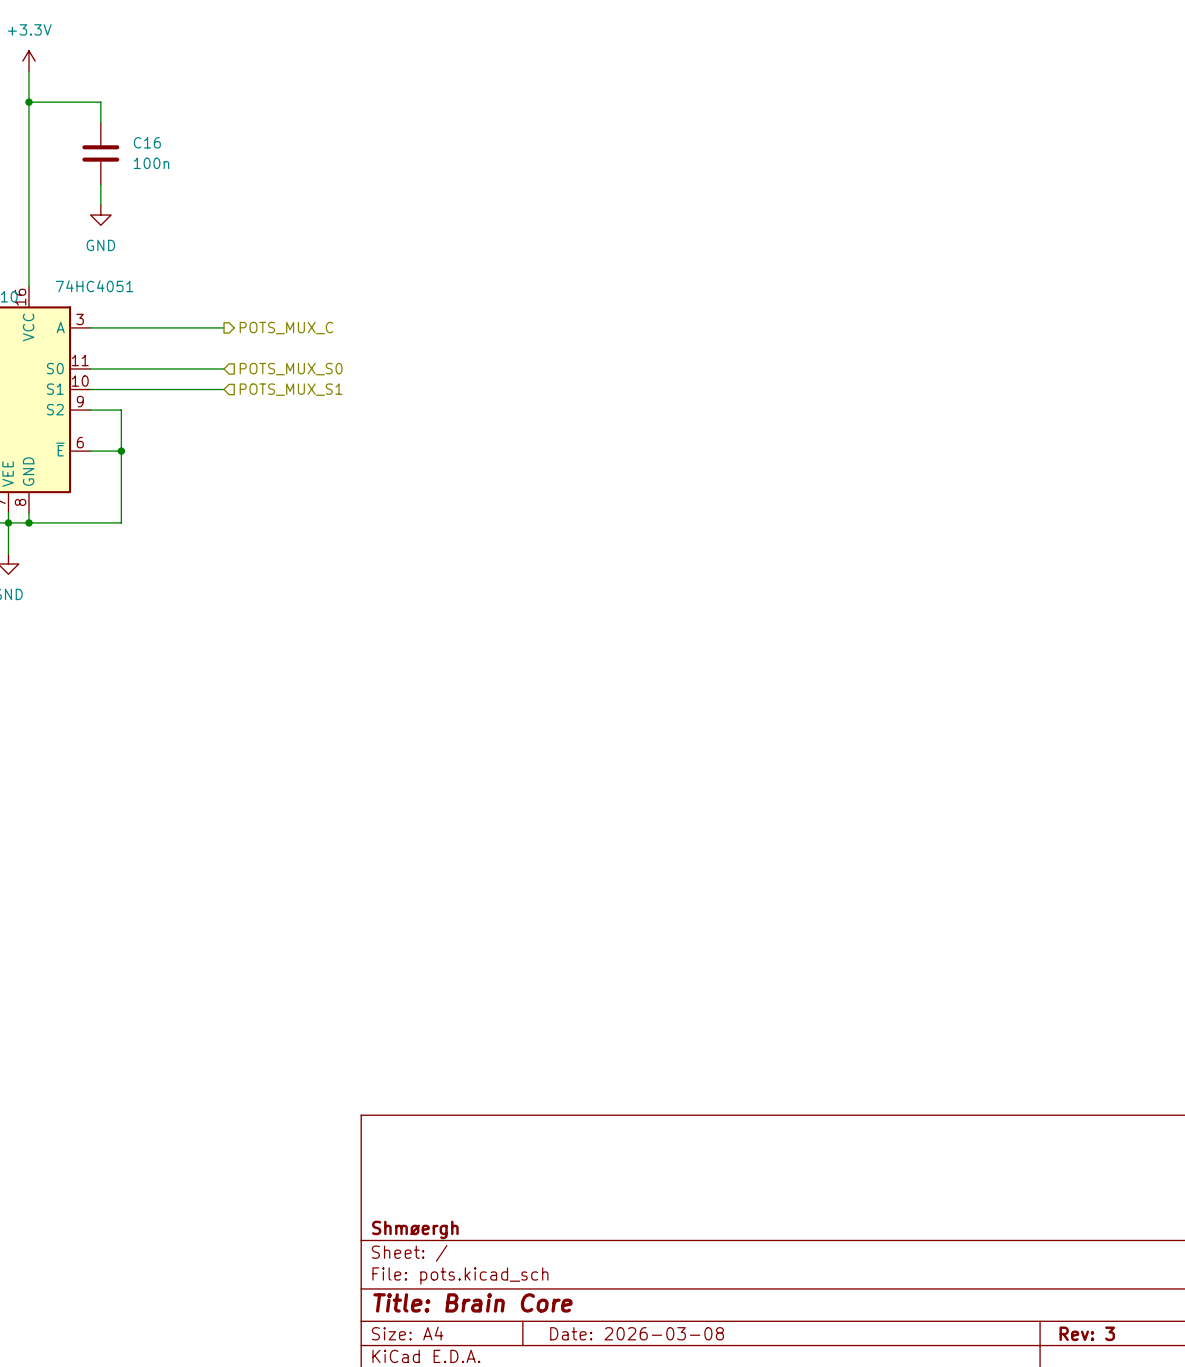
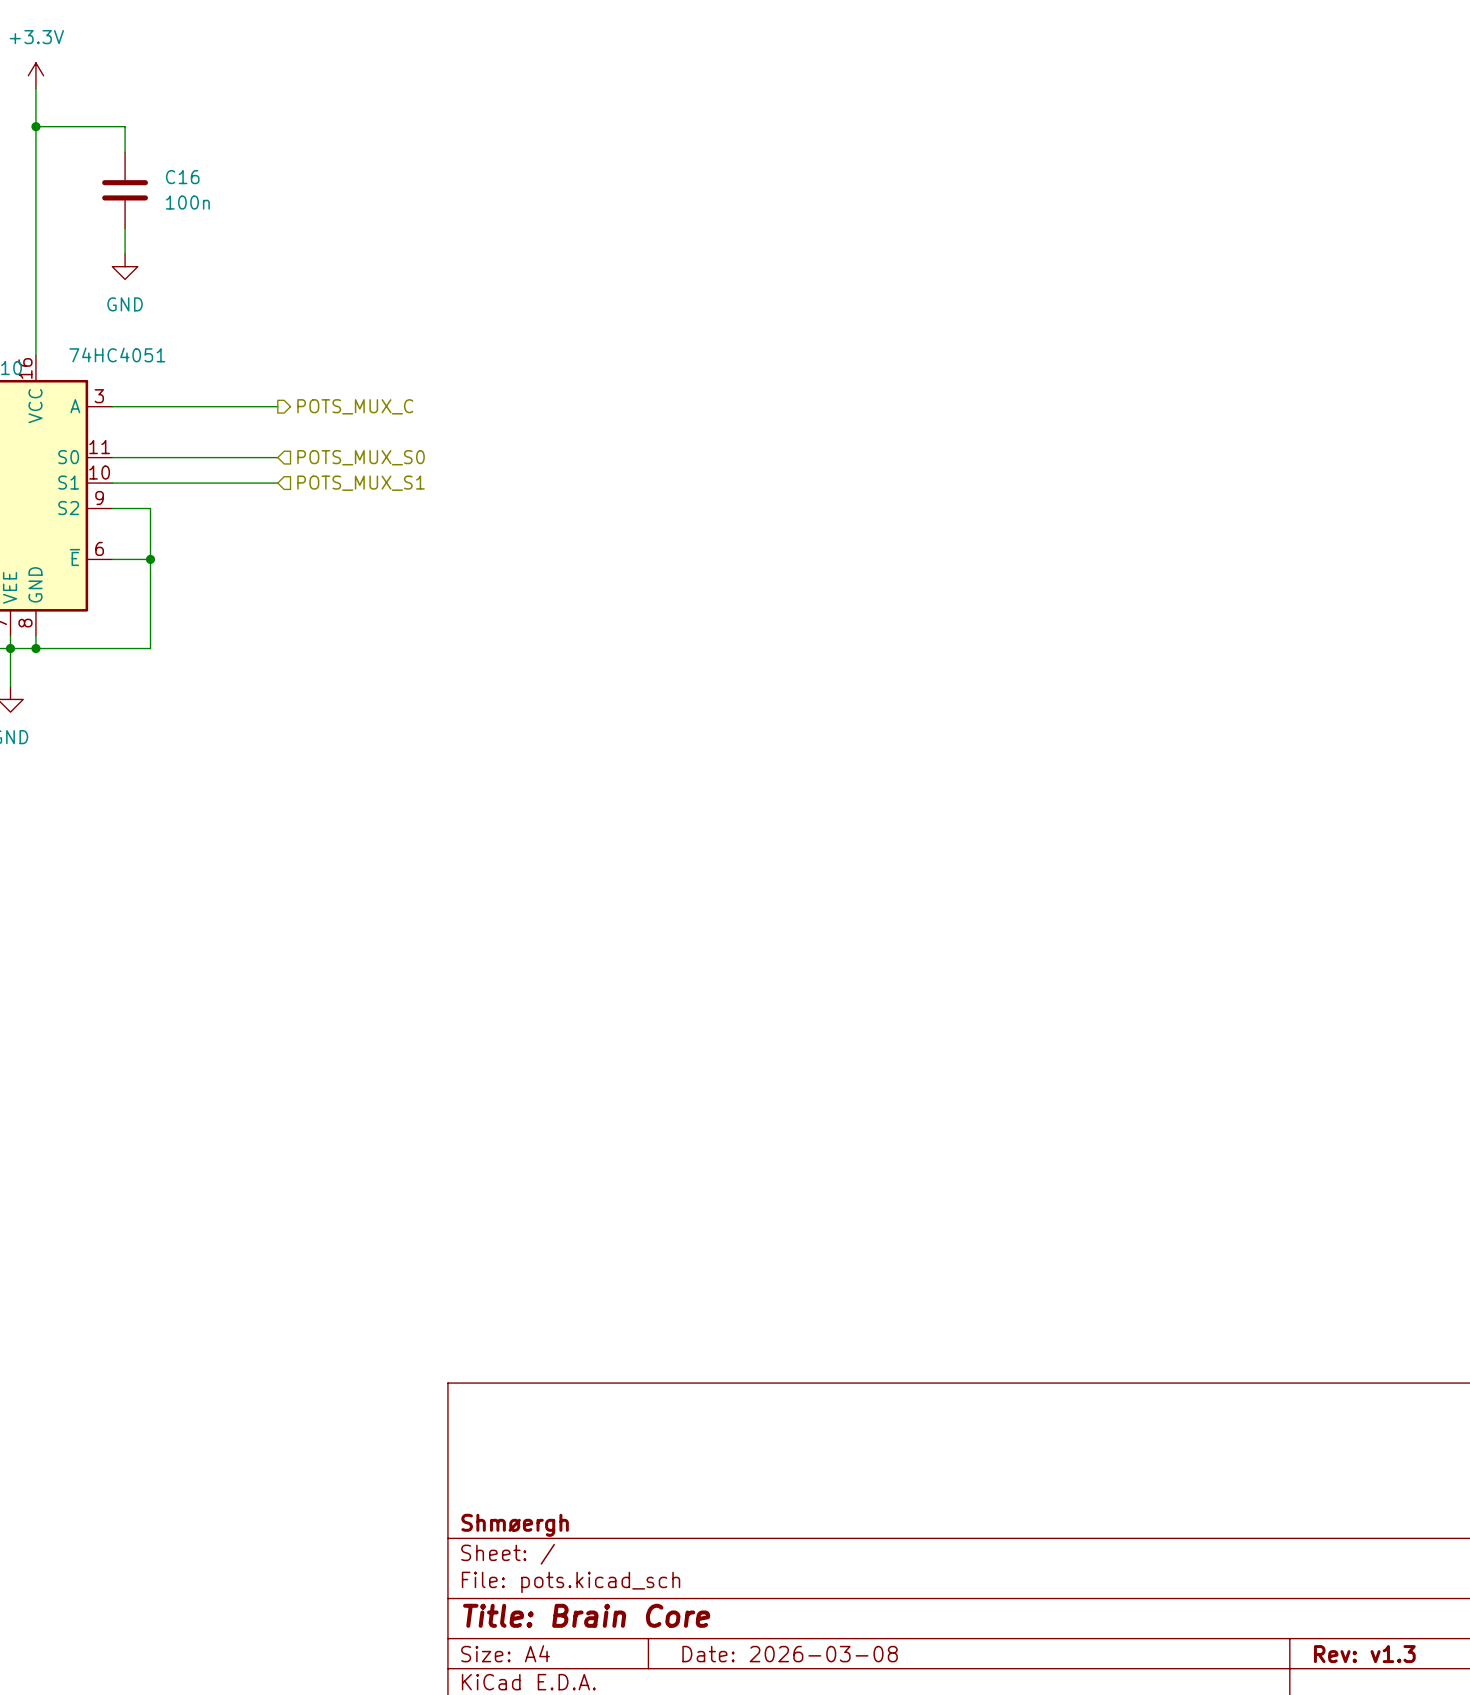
title block: Rev: 3 (1087, 1333) -> Rev: v1.3 (1364, 1654)

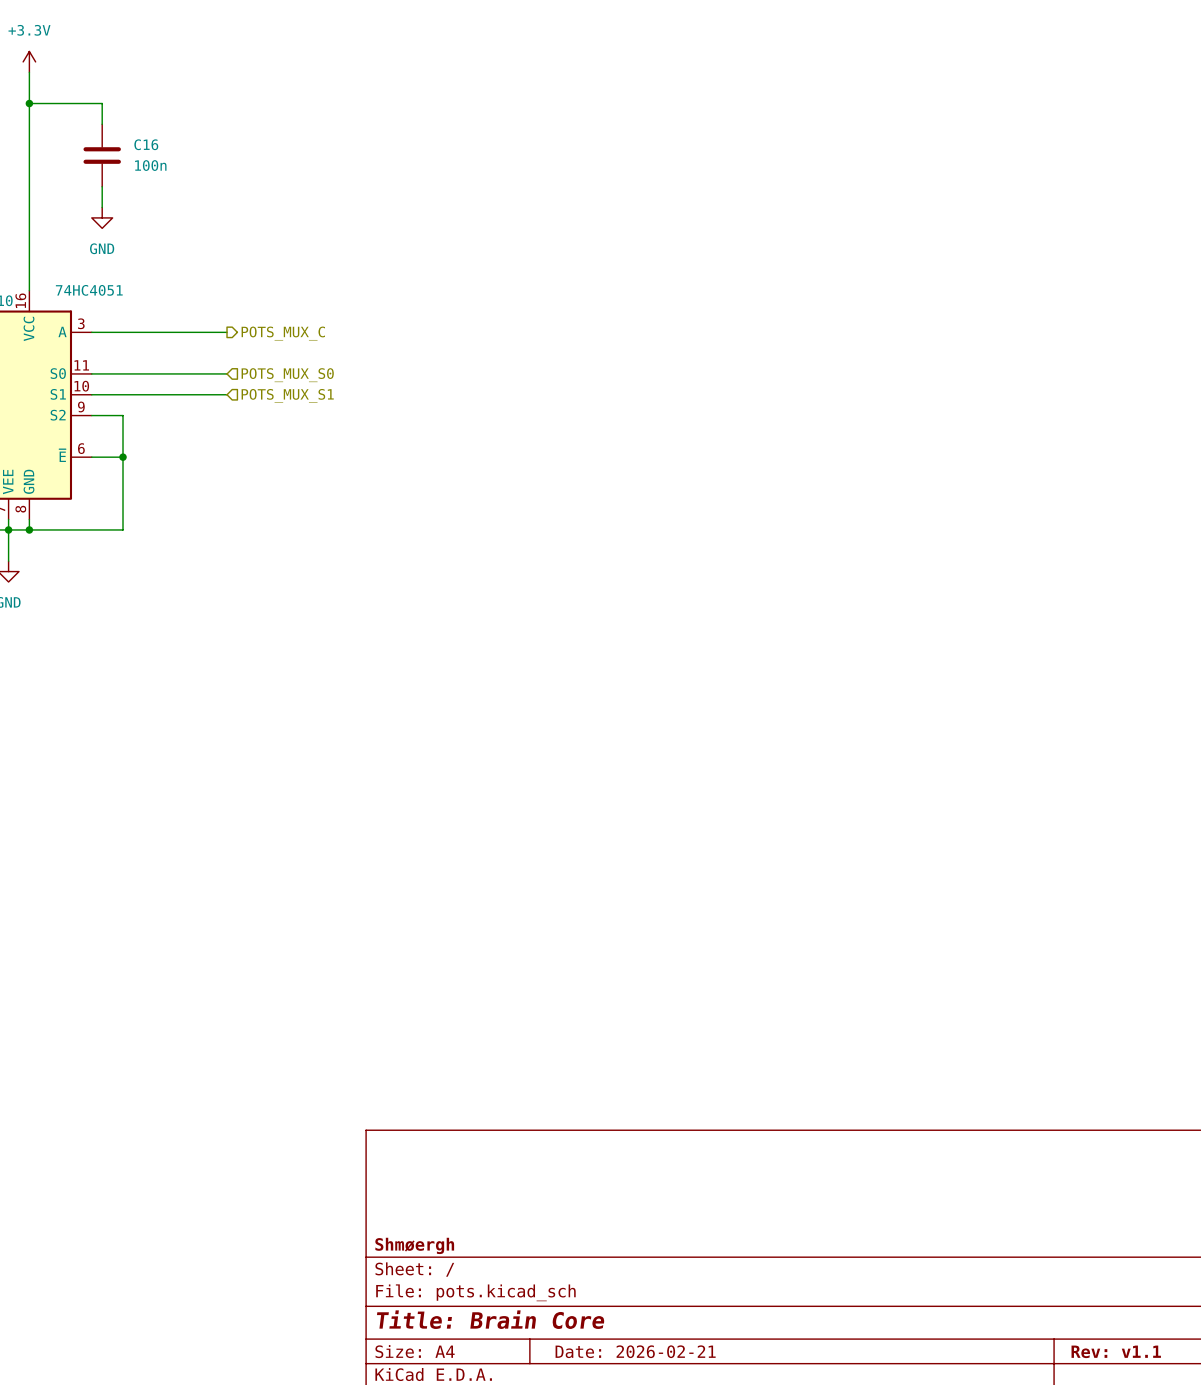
title block: Date: 2026-03-08 (790, 1654) -> Date: 2026-02-21 (635, 1351)
title block: Rev: v1.3 (1364, 1654) -> Rev: v1.1 (1116, 1351)

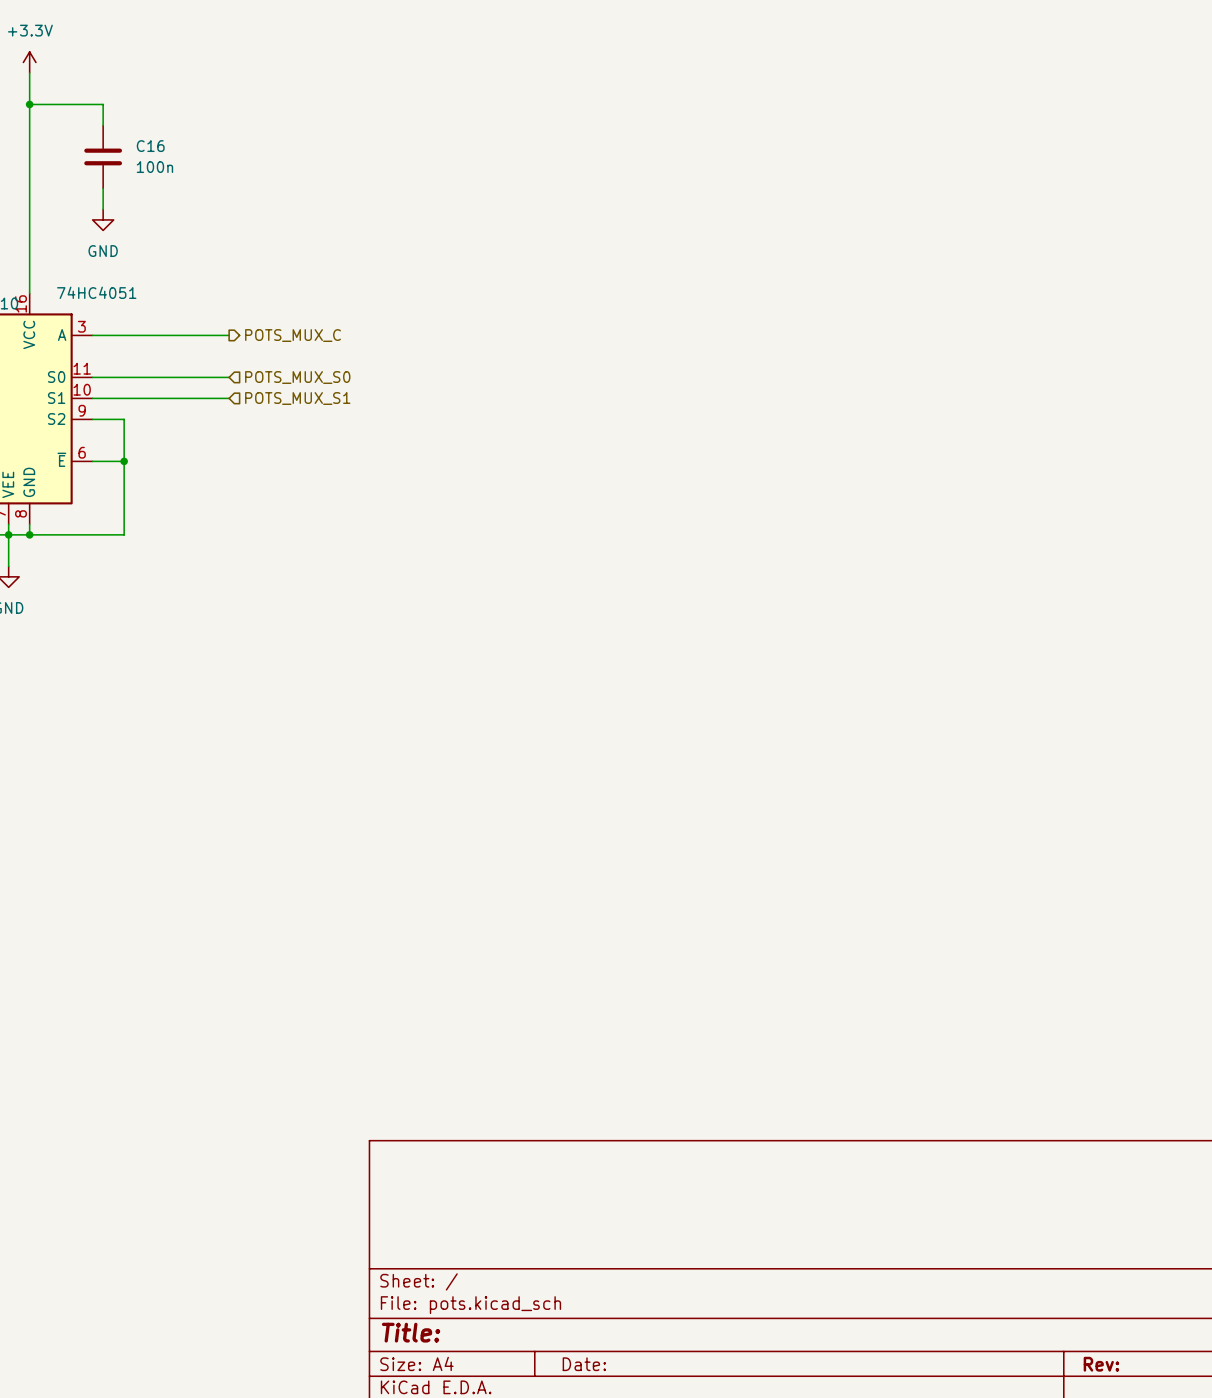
title block: Shmøergh (414, 1245) -> none
title block: Title: Brain Core (490, 1319) -> Title: (411, 1332)
title block: Date: 2026-02-21 (635, 1351) -> Date: (584, 1364)
title block: Rev: v1.1 (1116, 1351) -> Rev: (1101, 1364)

